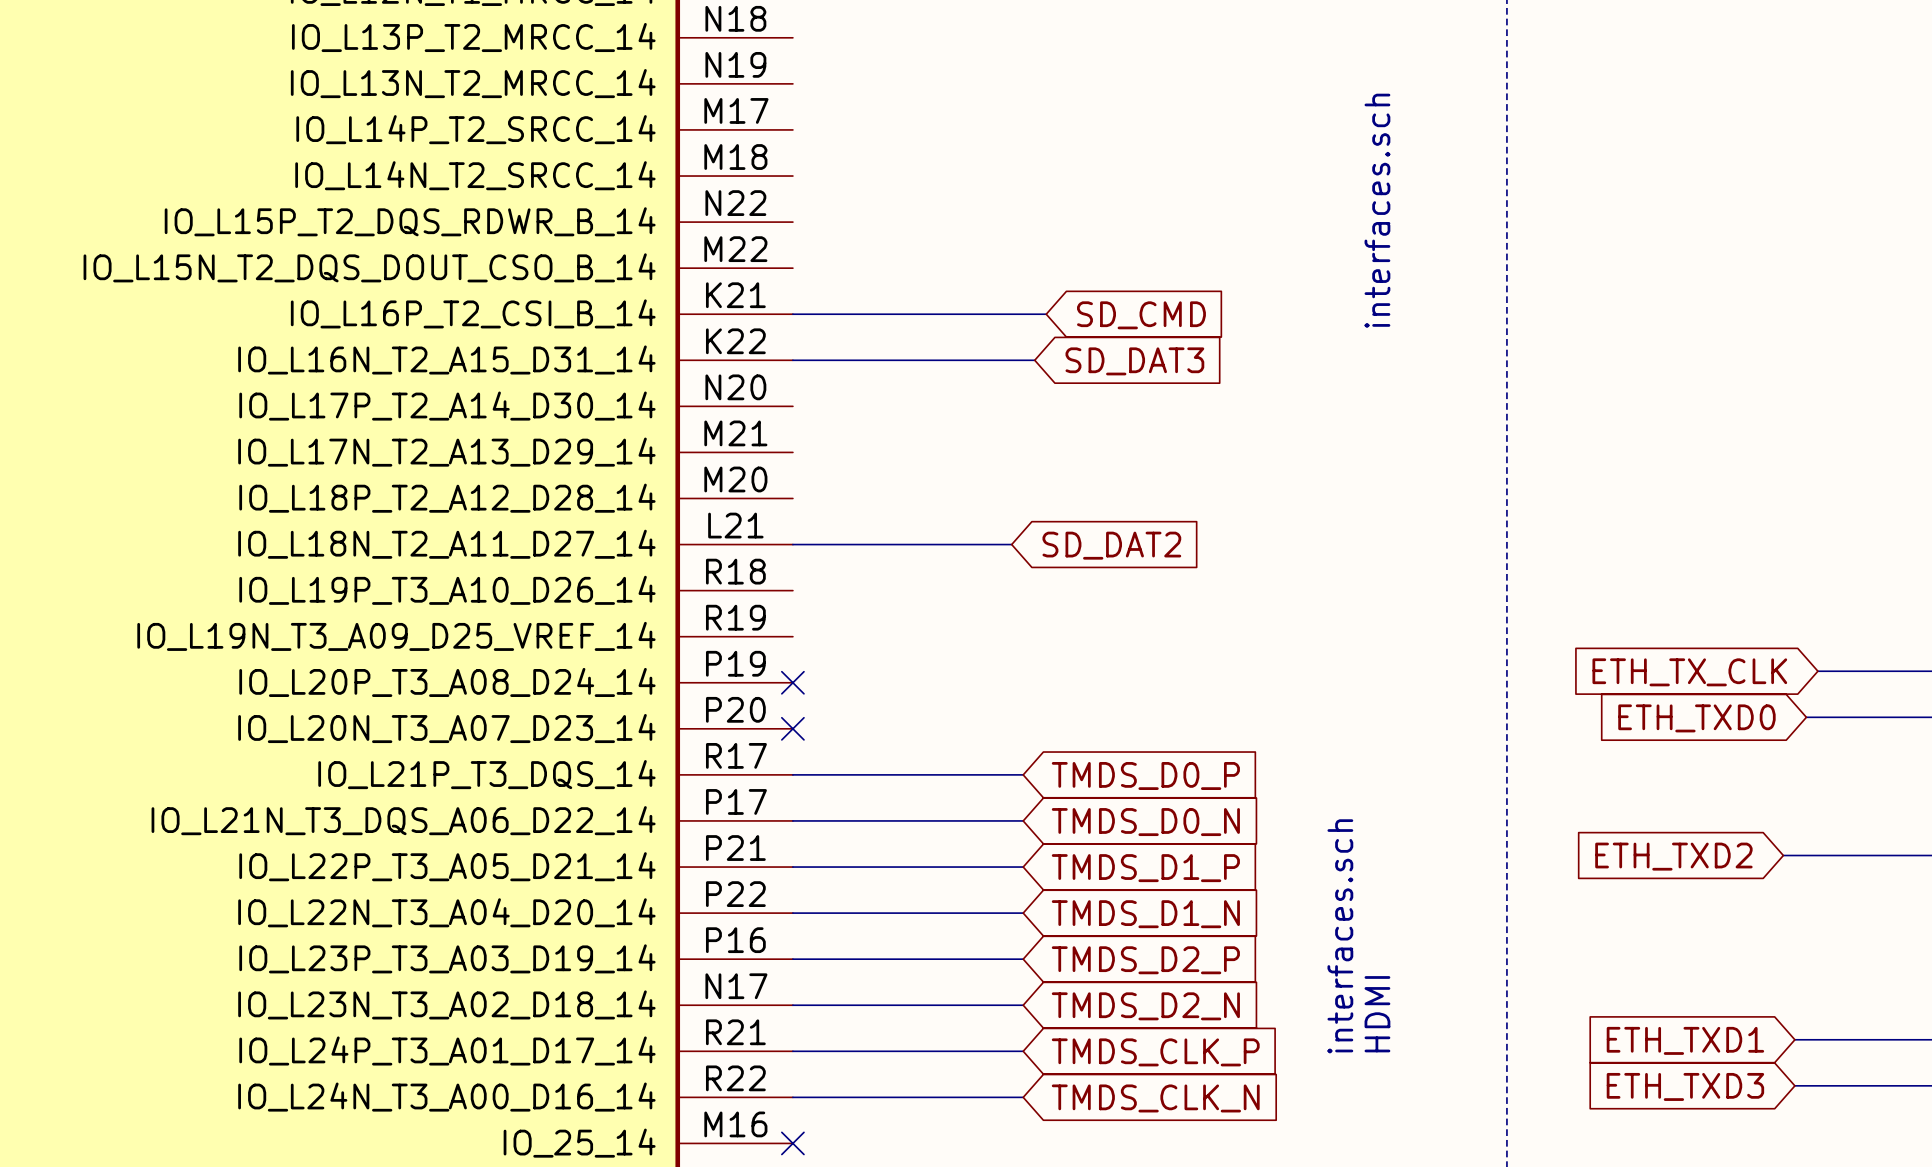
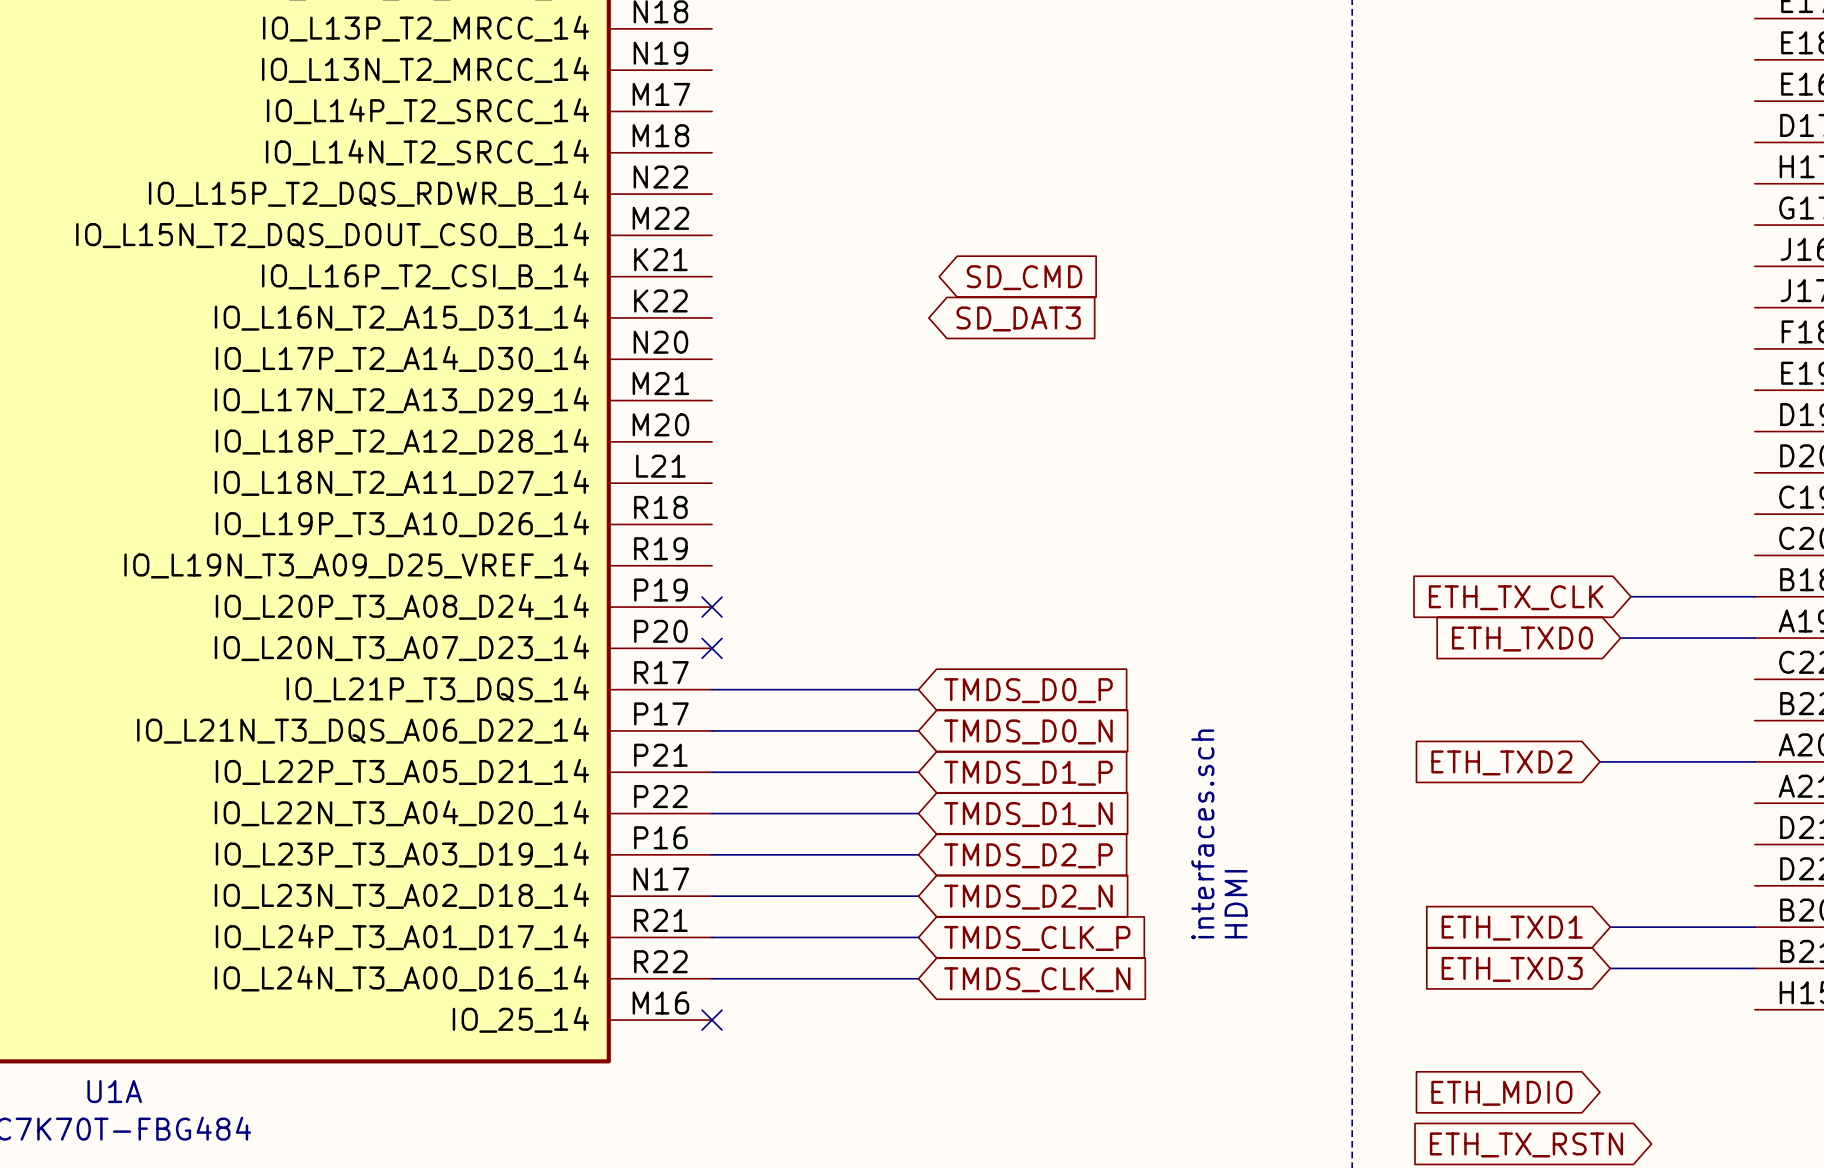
text: interfaces.sch (1377, 210) -> none
wire: (792, 314) (1046, 314) -> none
wire: (792, 360) (1034, 360) -> none
wire: (792, 544) (1011, 544) -> none
global label: SD_DAT2 (1111, 545) -> none

